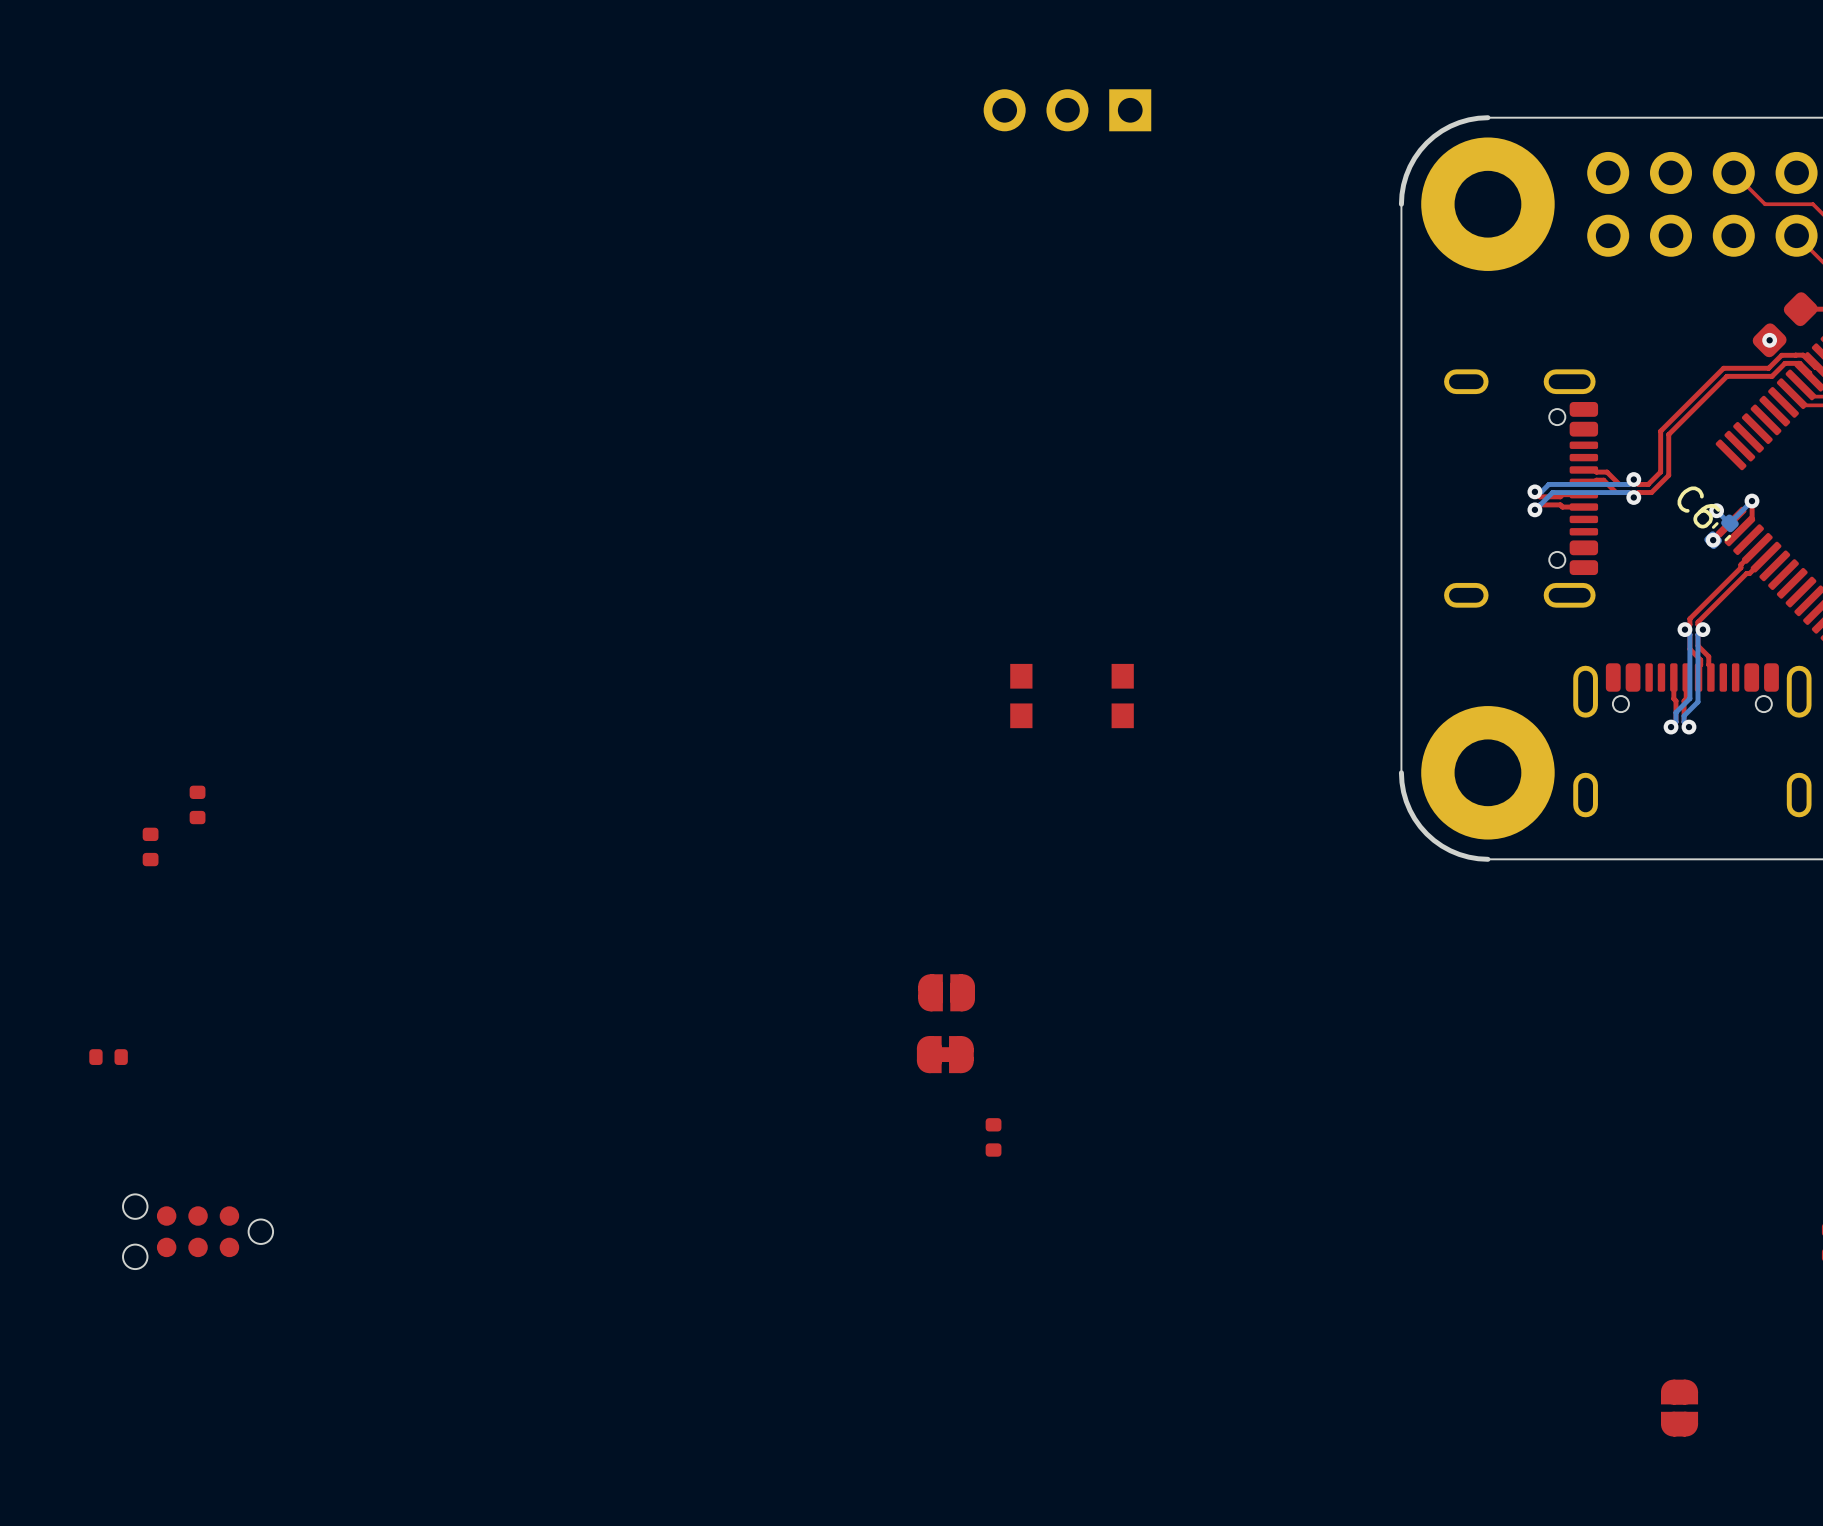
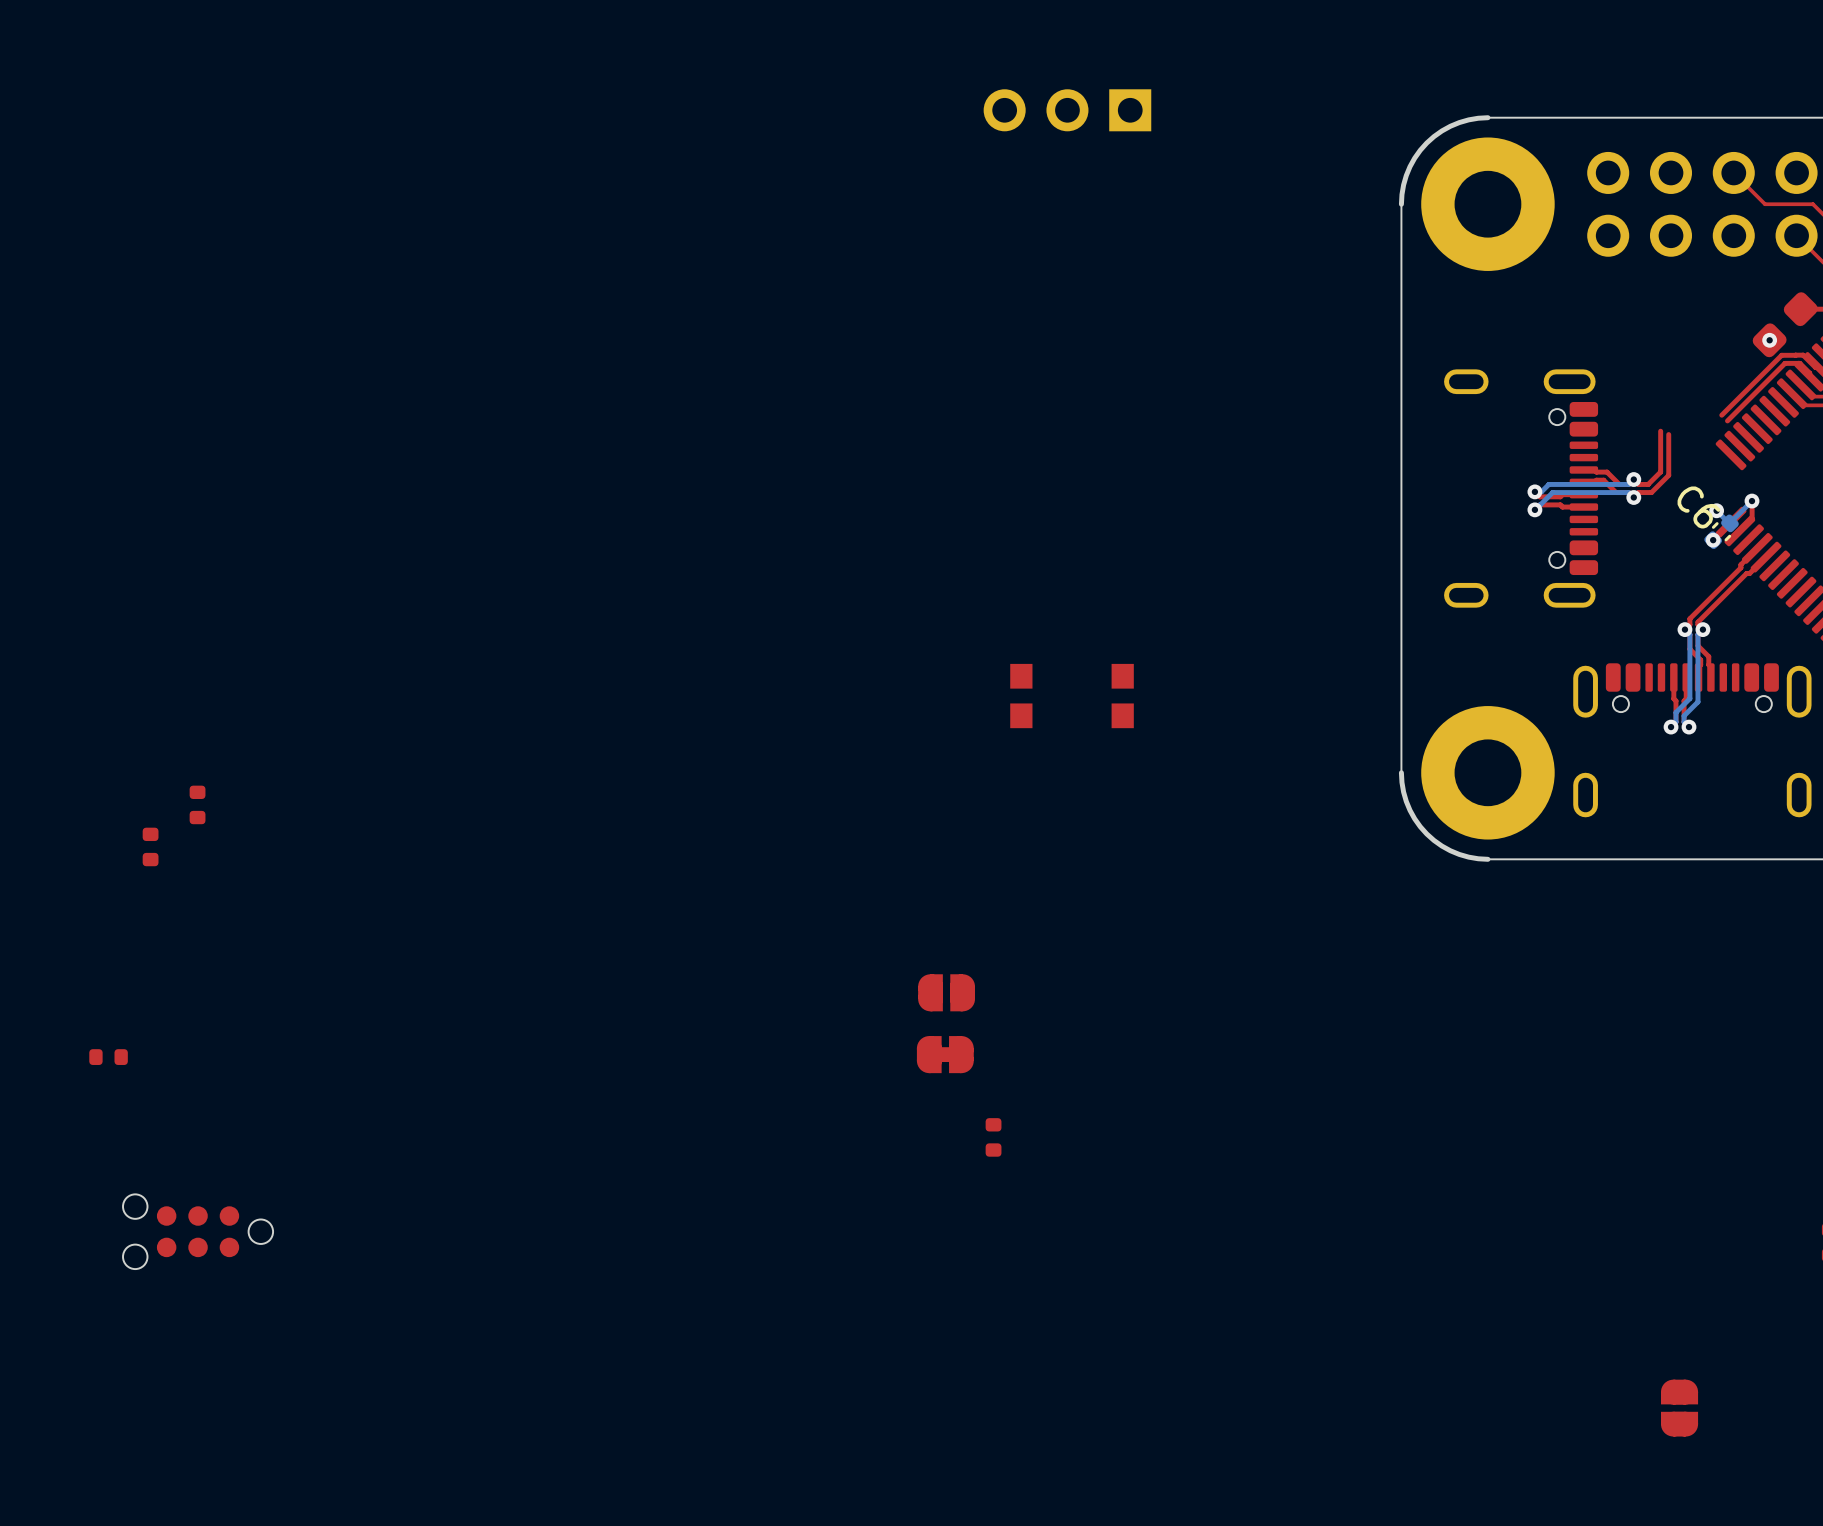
top track: (1768, 368) (1723, 368) (1660, 431) -> (1768, 368) (1721, 415)
top track: (1772, 376) (1726, 376) (1668, 434) -> (1772, 376) (1727, 420)

